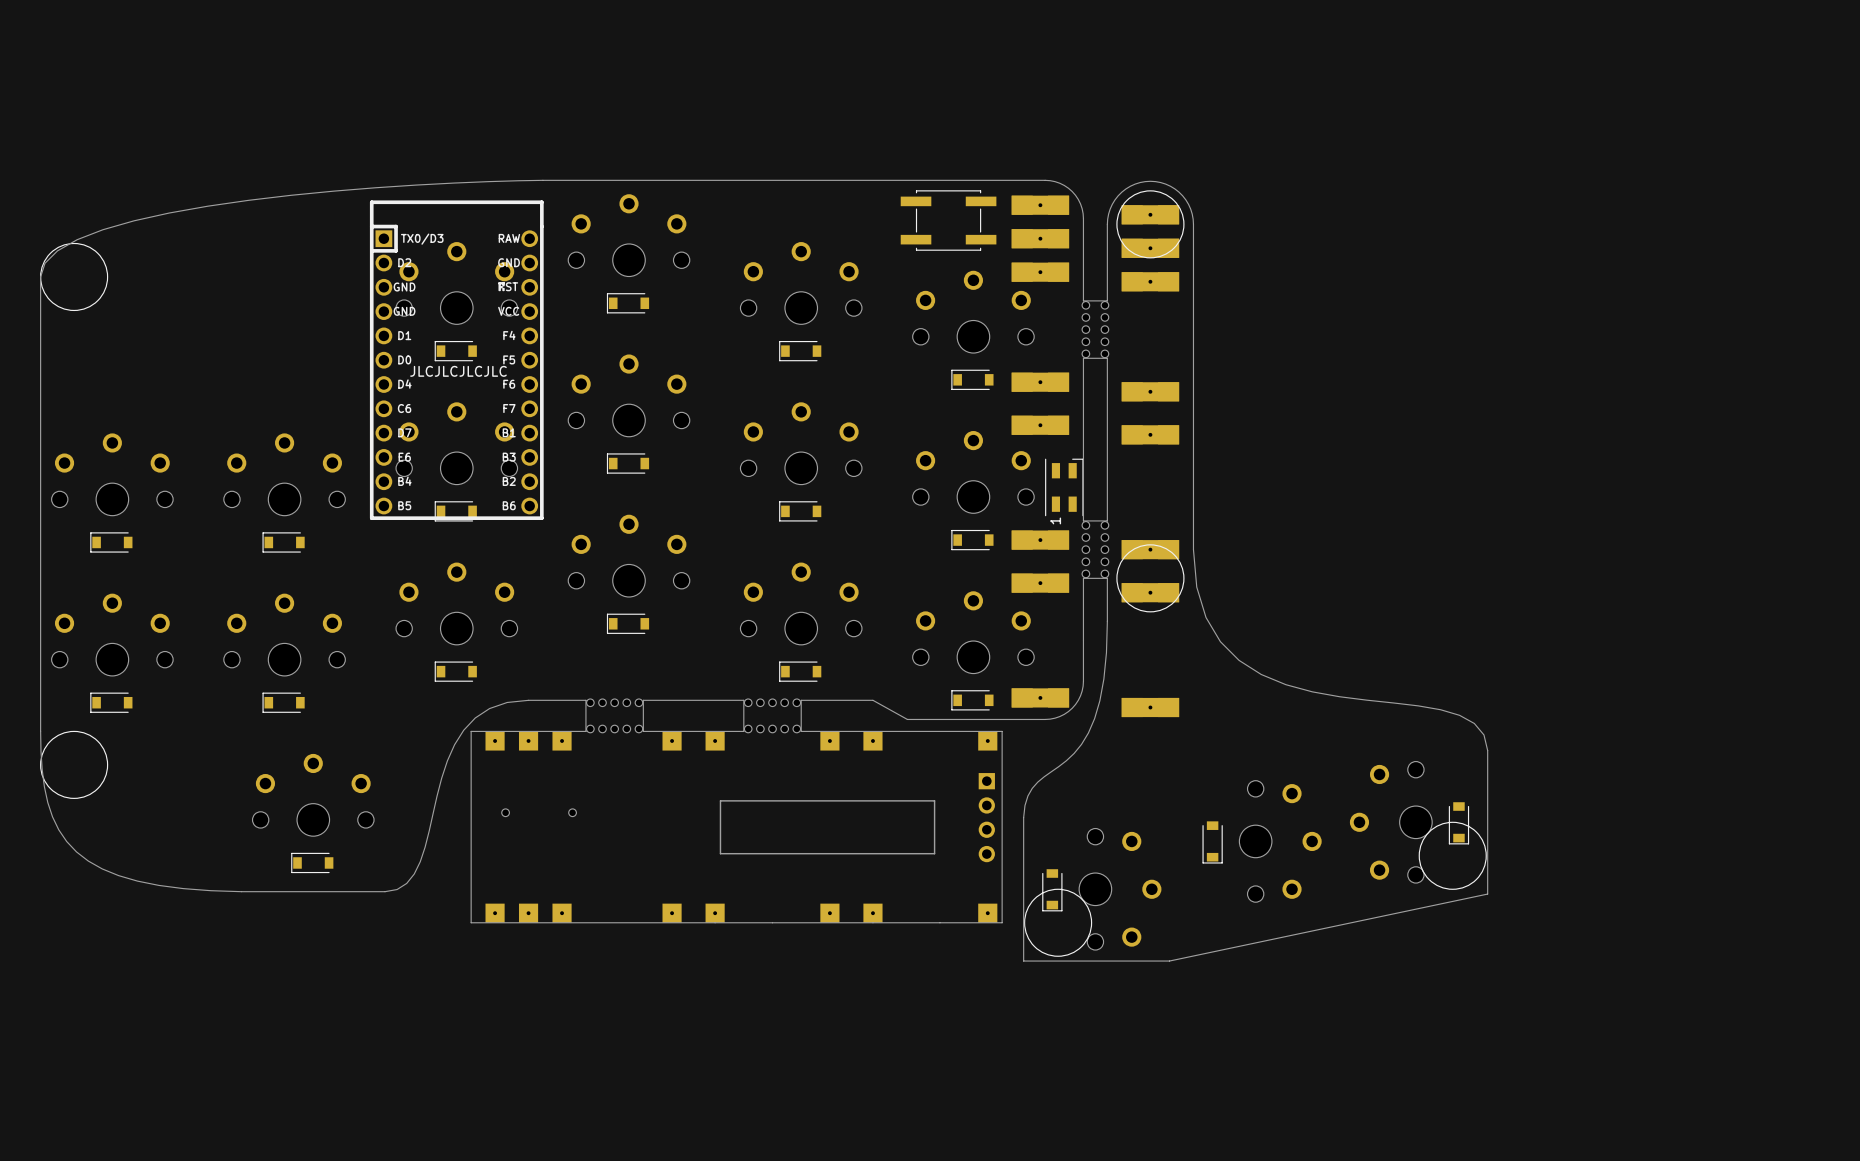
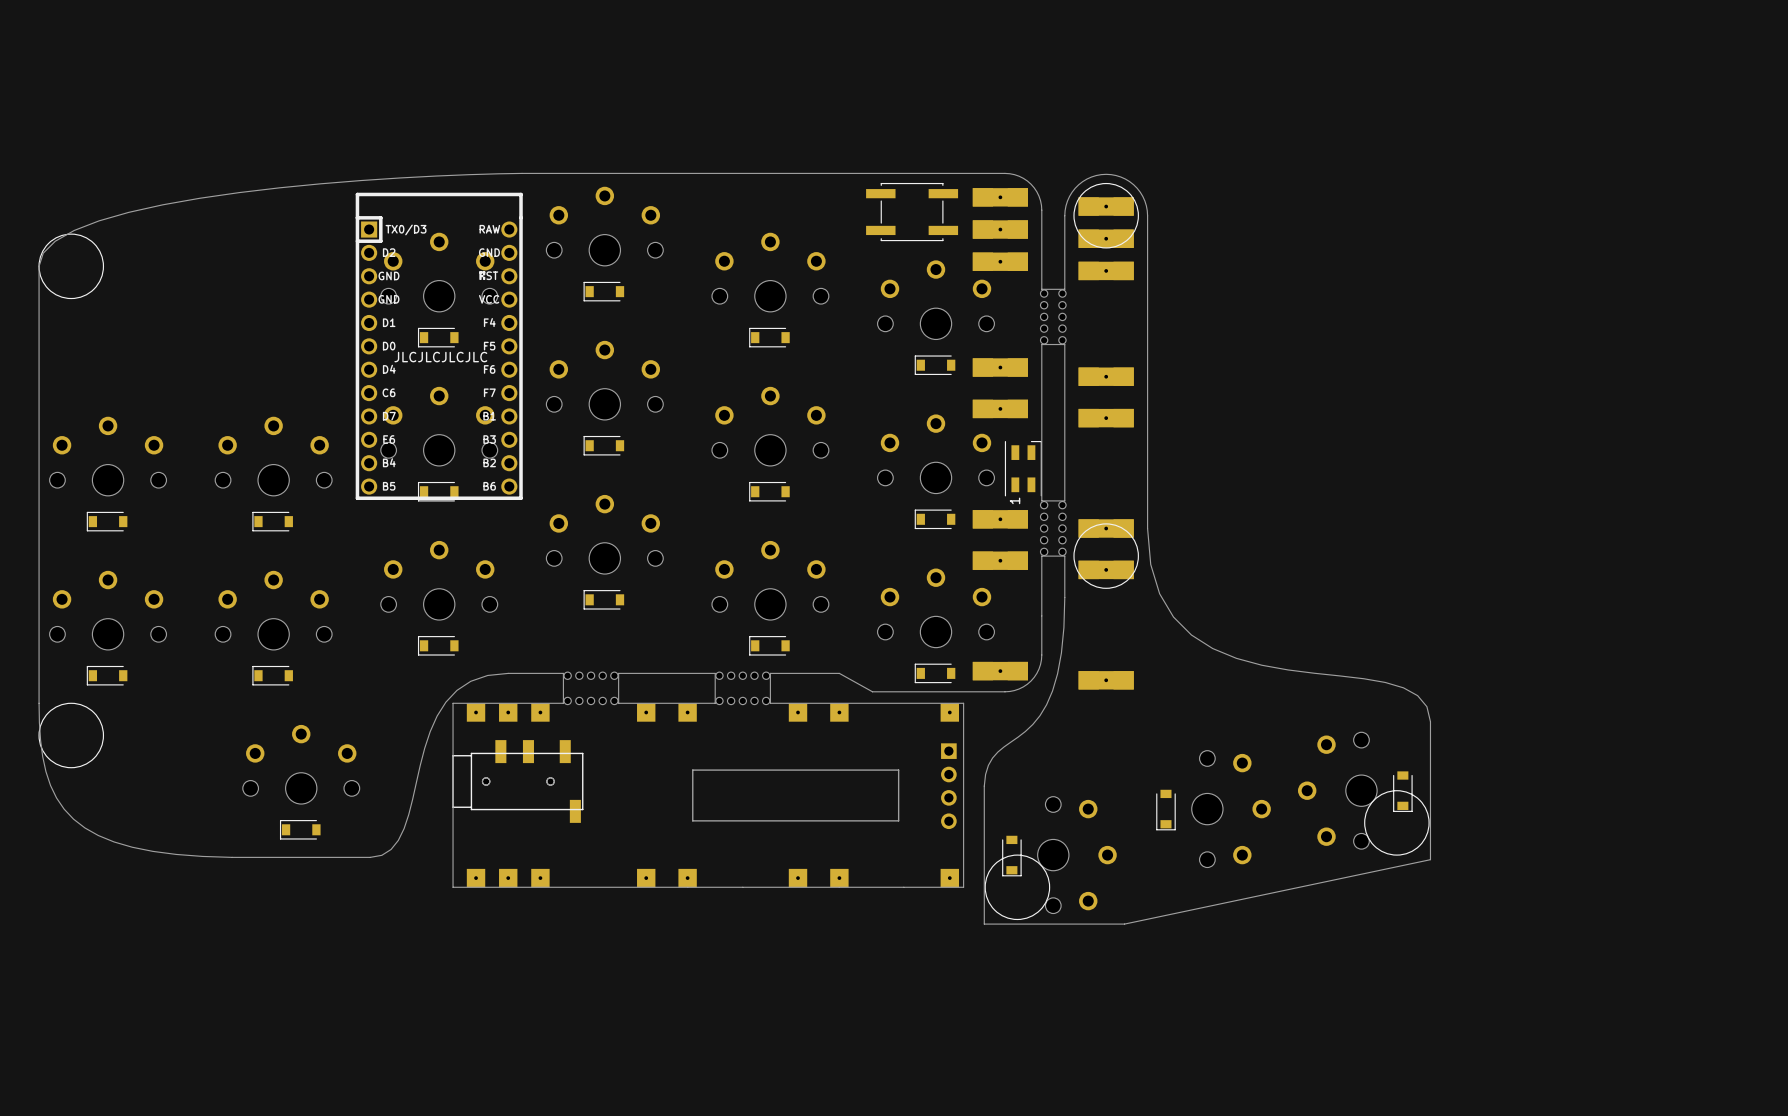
part: none -> (517, 781)

